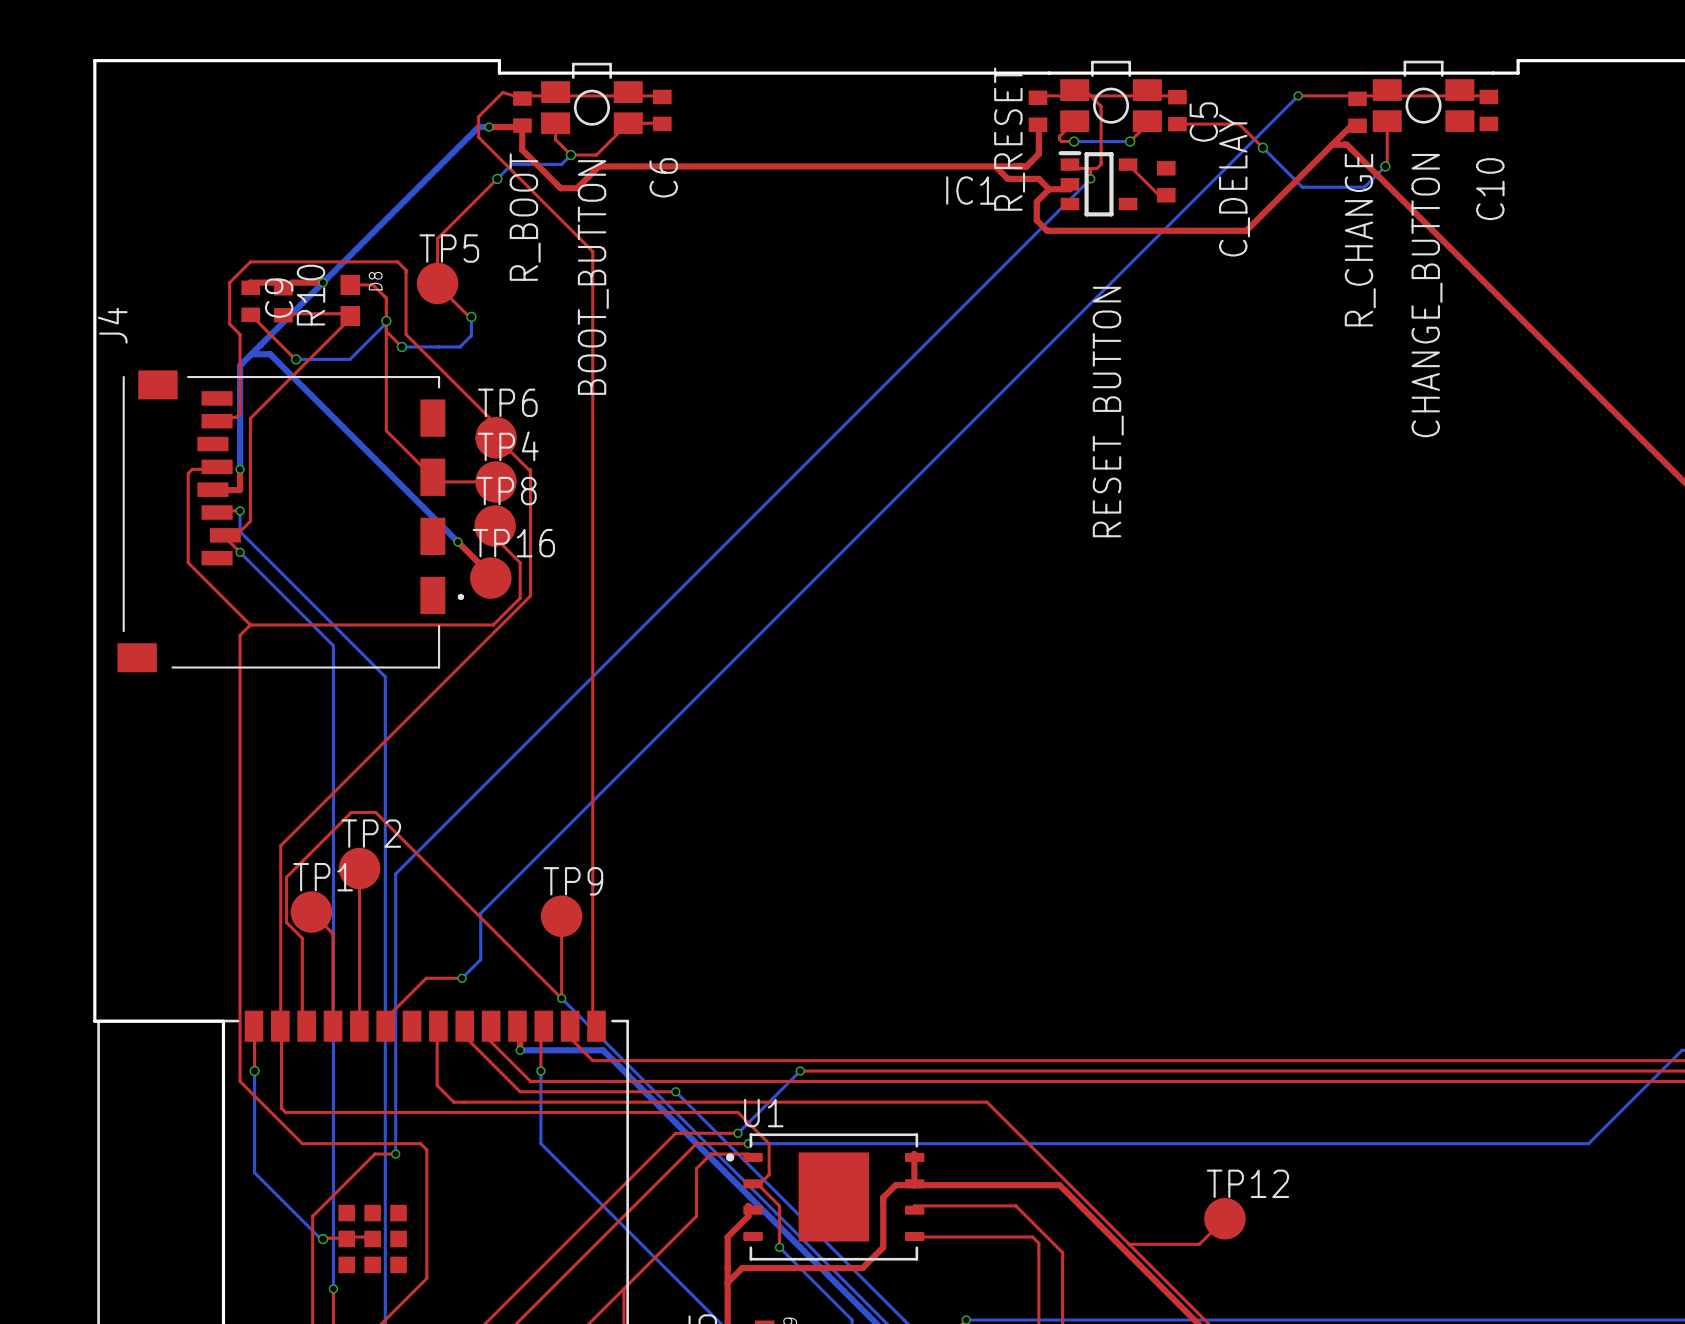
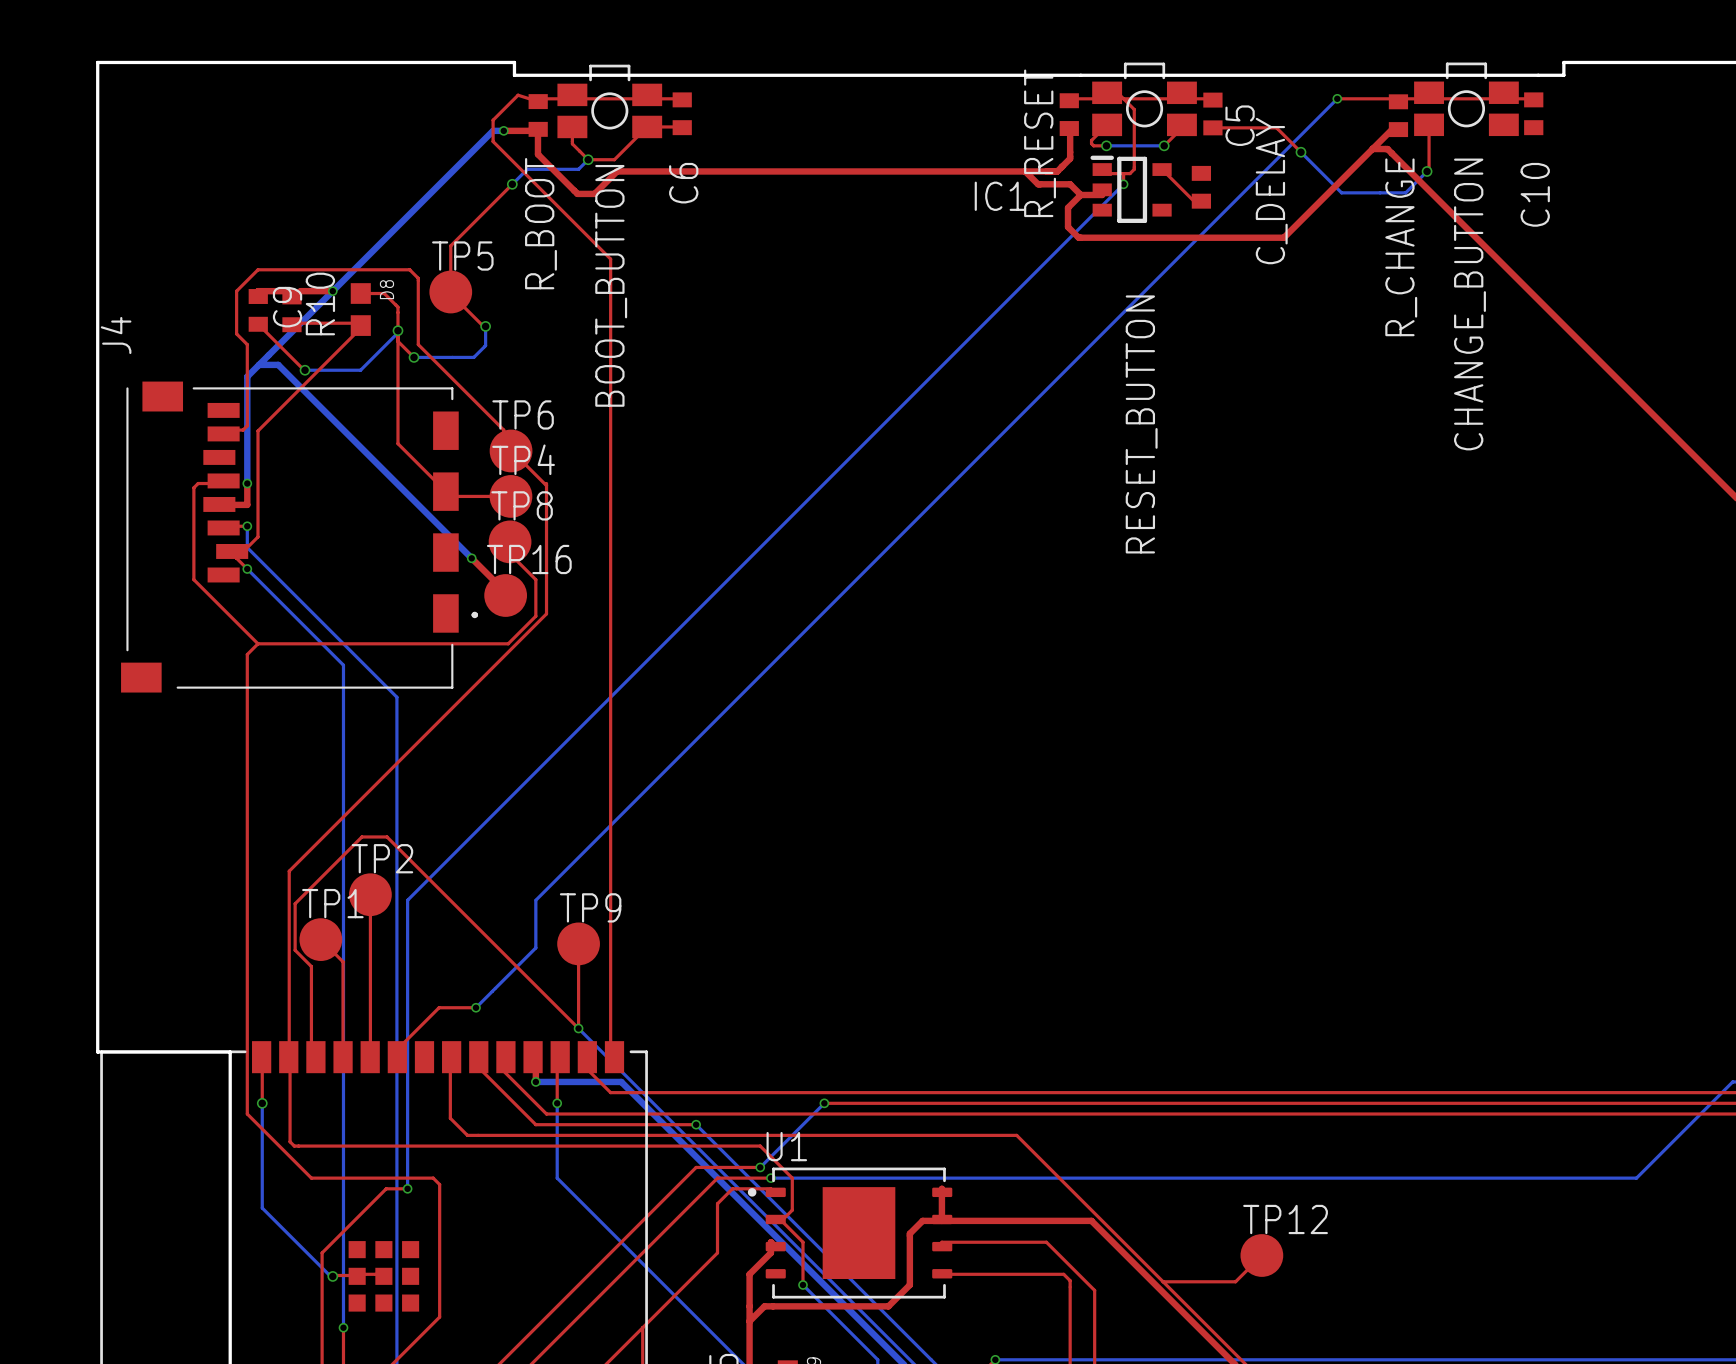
bottom track: (520, 873) (480, 913) (480, 959) -> (535, 900) (535, 947) (495, 988)

